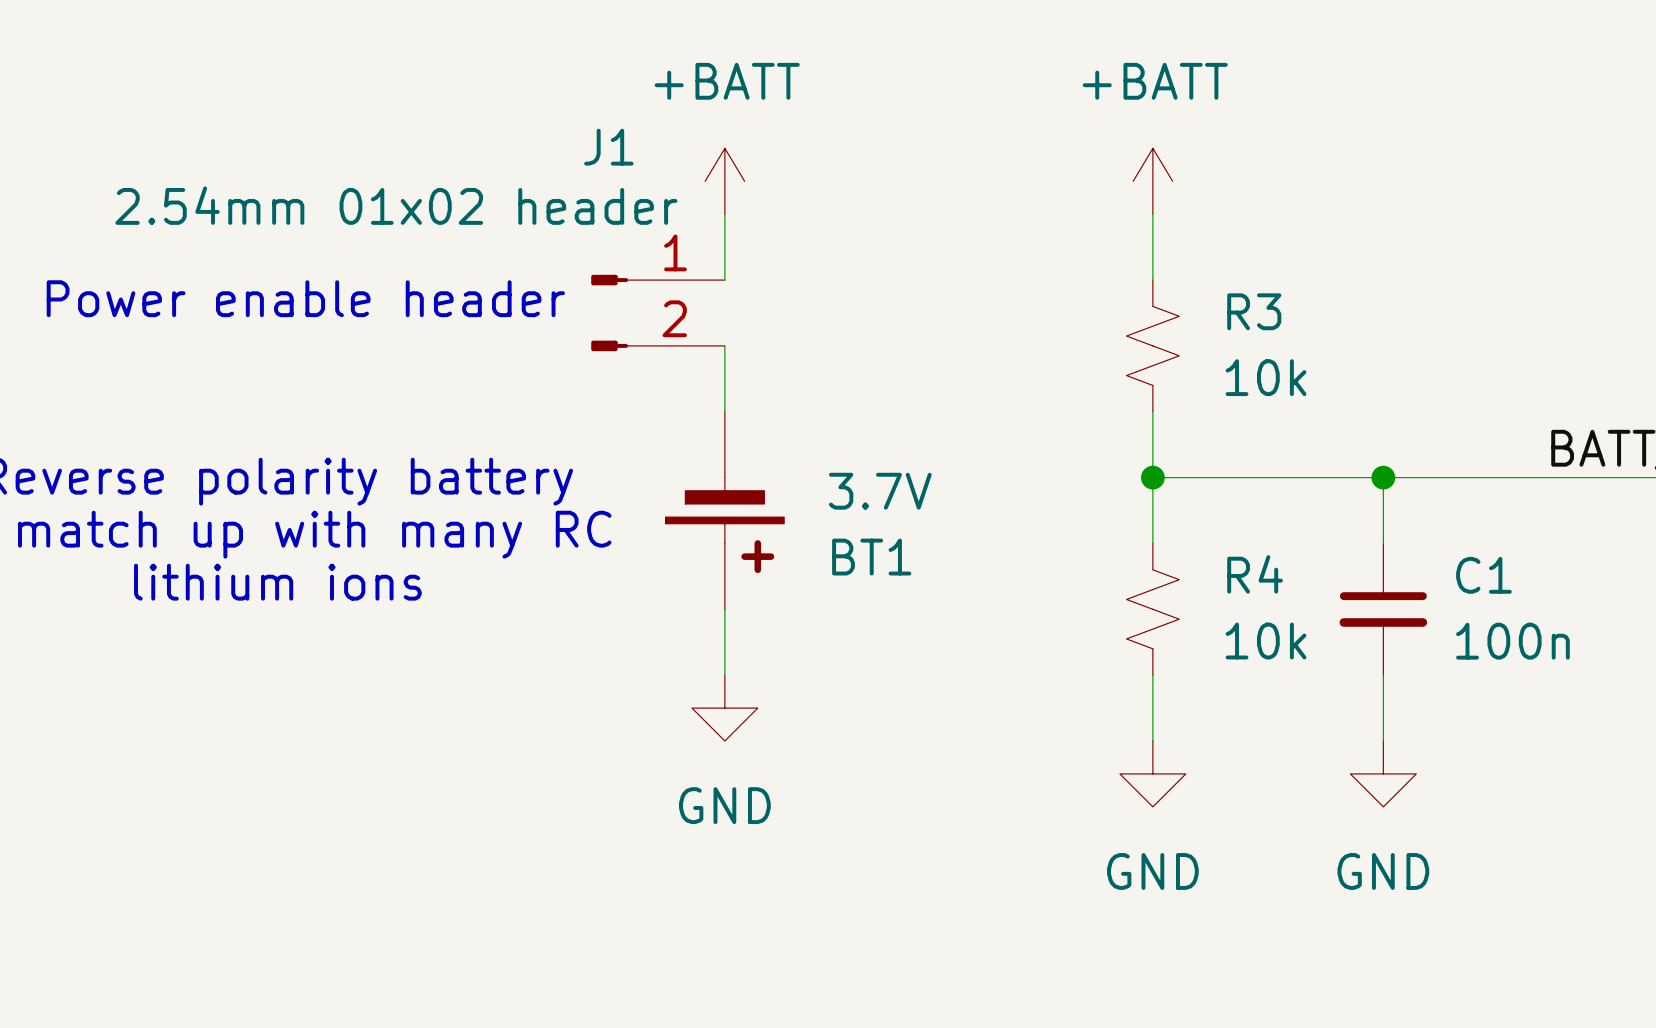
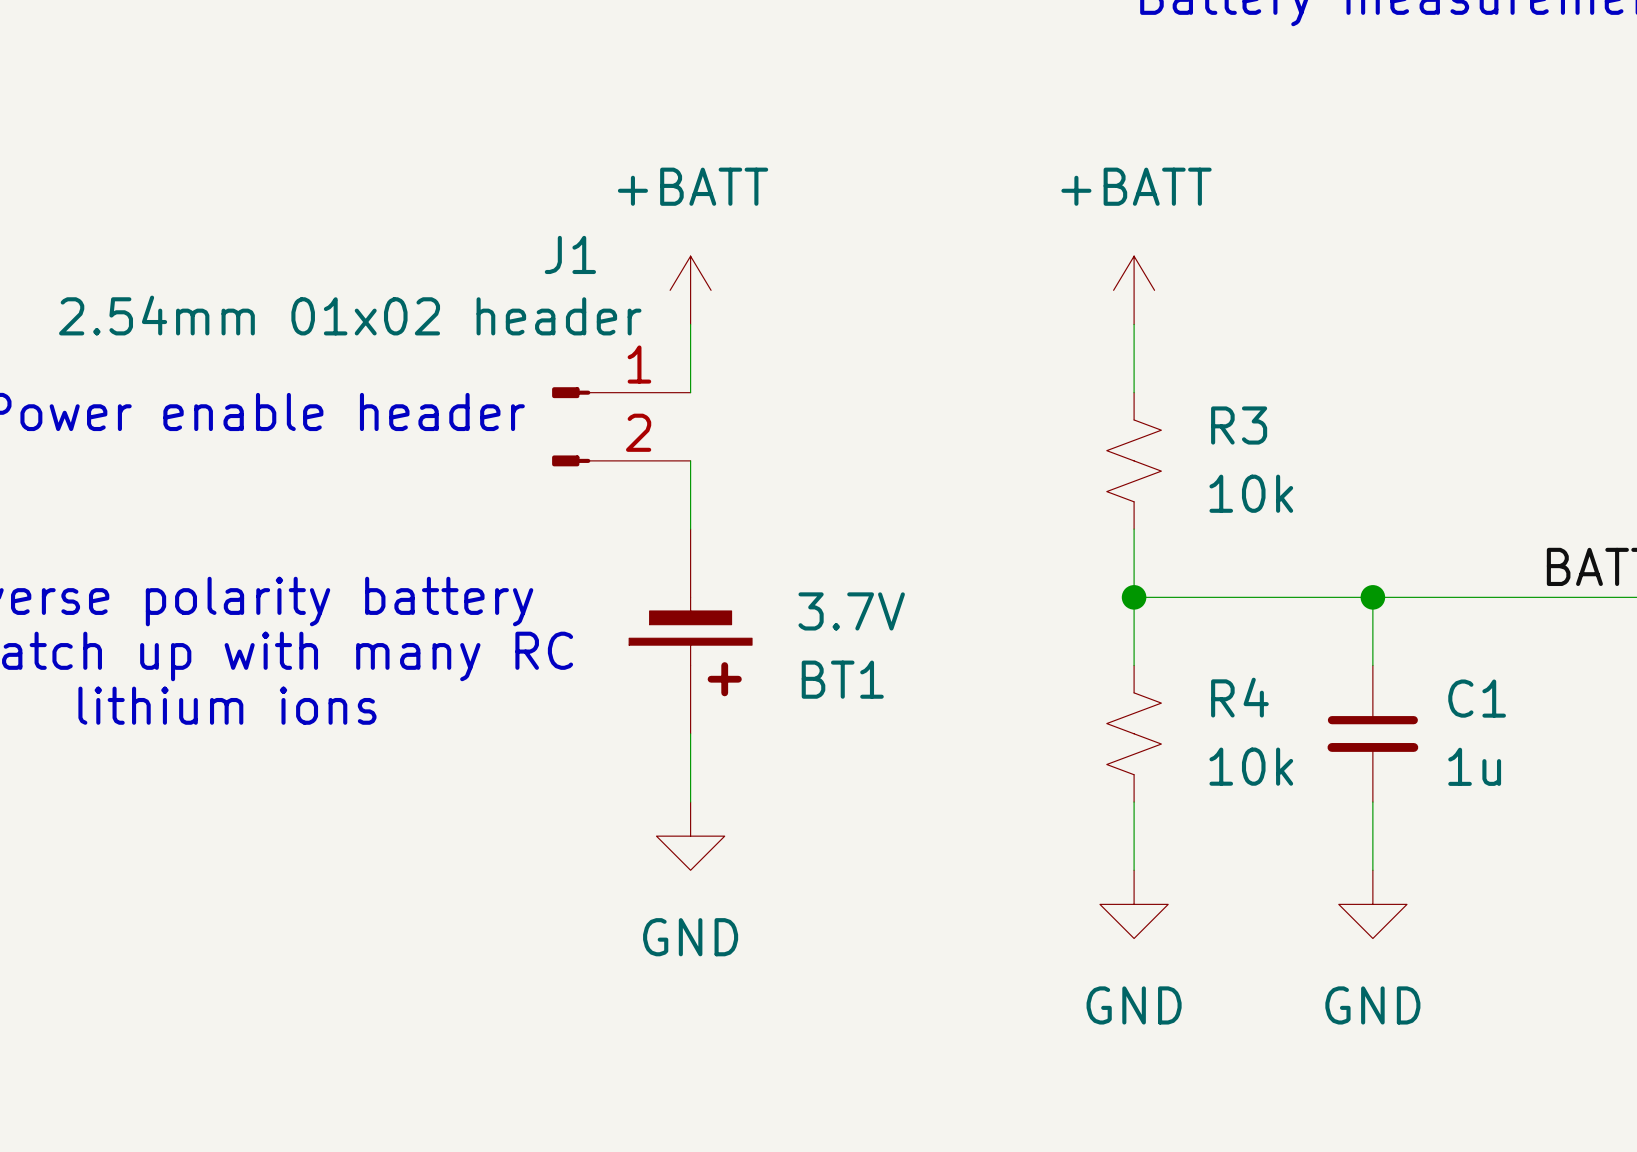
C1 value: 100n (1512, 641) -> 1u (1474, 766)

